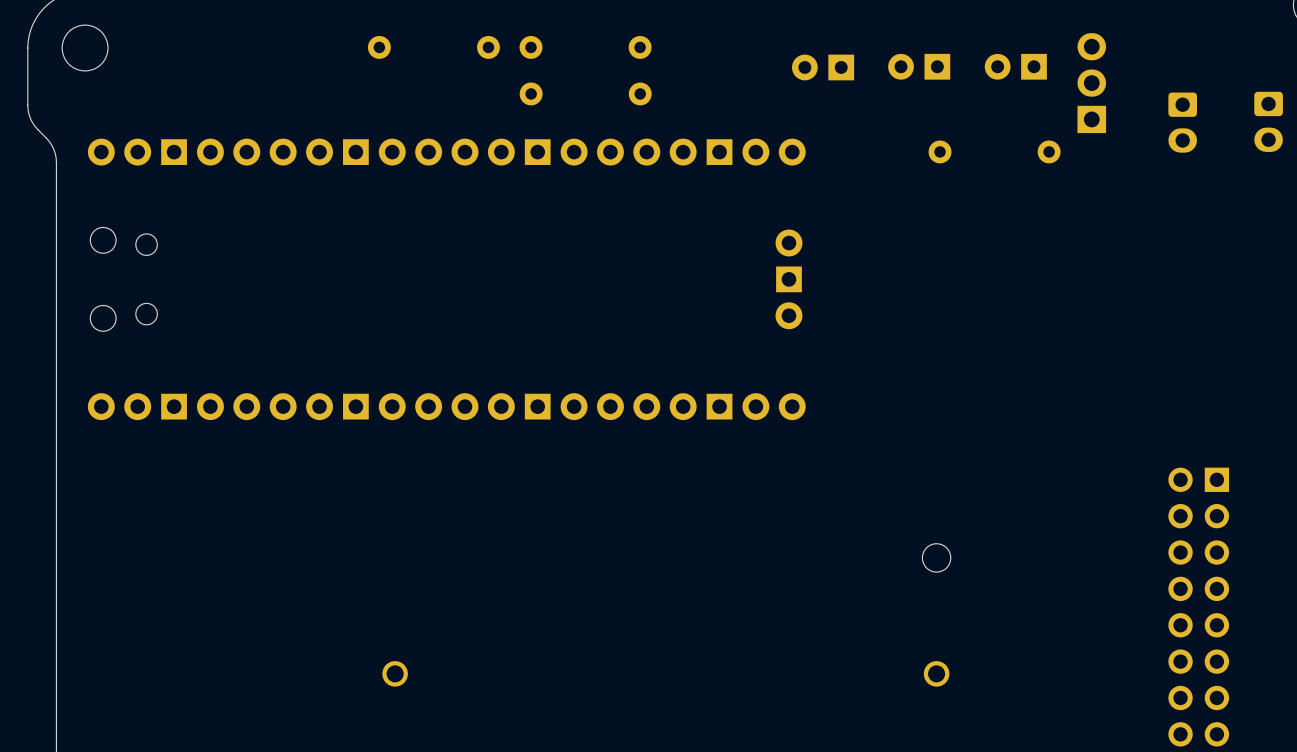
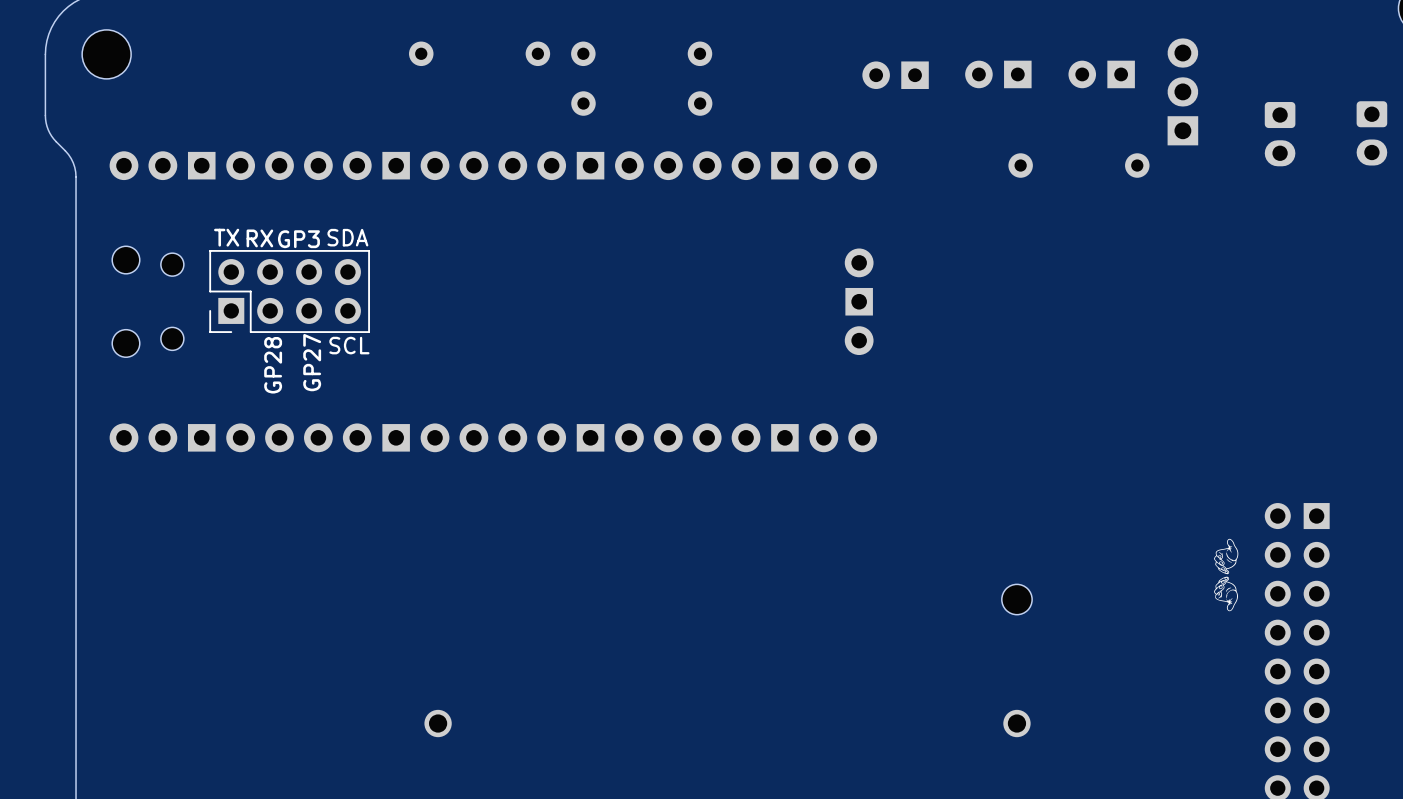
text: none -> TX (226, 237)
text: none -> SDA (347, 237)
text: none -> RX (259, 238)
text: none -> GP3 (298, 239)
part: none -> (289, 291)
text: none -> SCL (349, 345)
text: none -> GP27 (312, 362)
text: none -> GP28 (273, 365)
drawing: none -> [1214, 538, 1239, 612]

